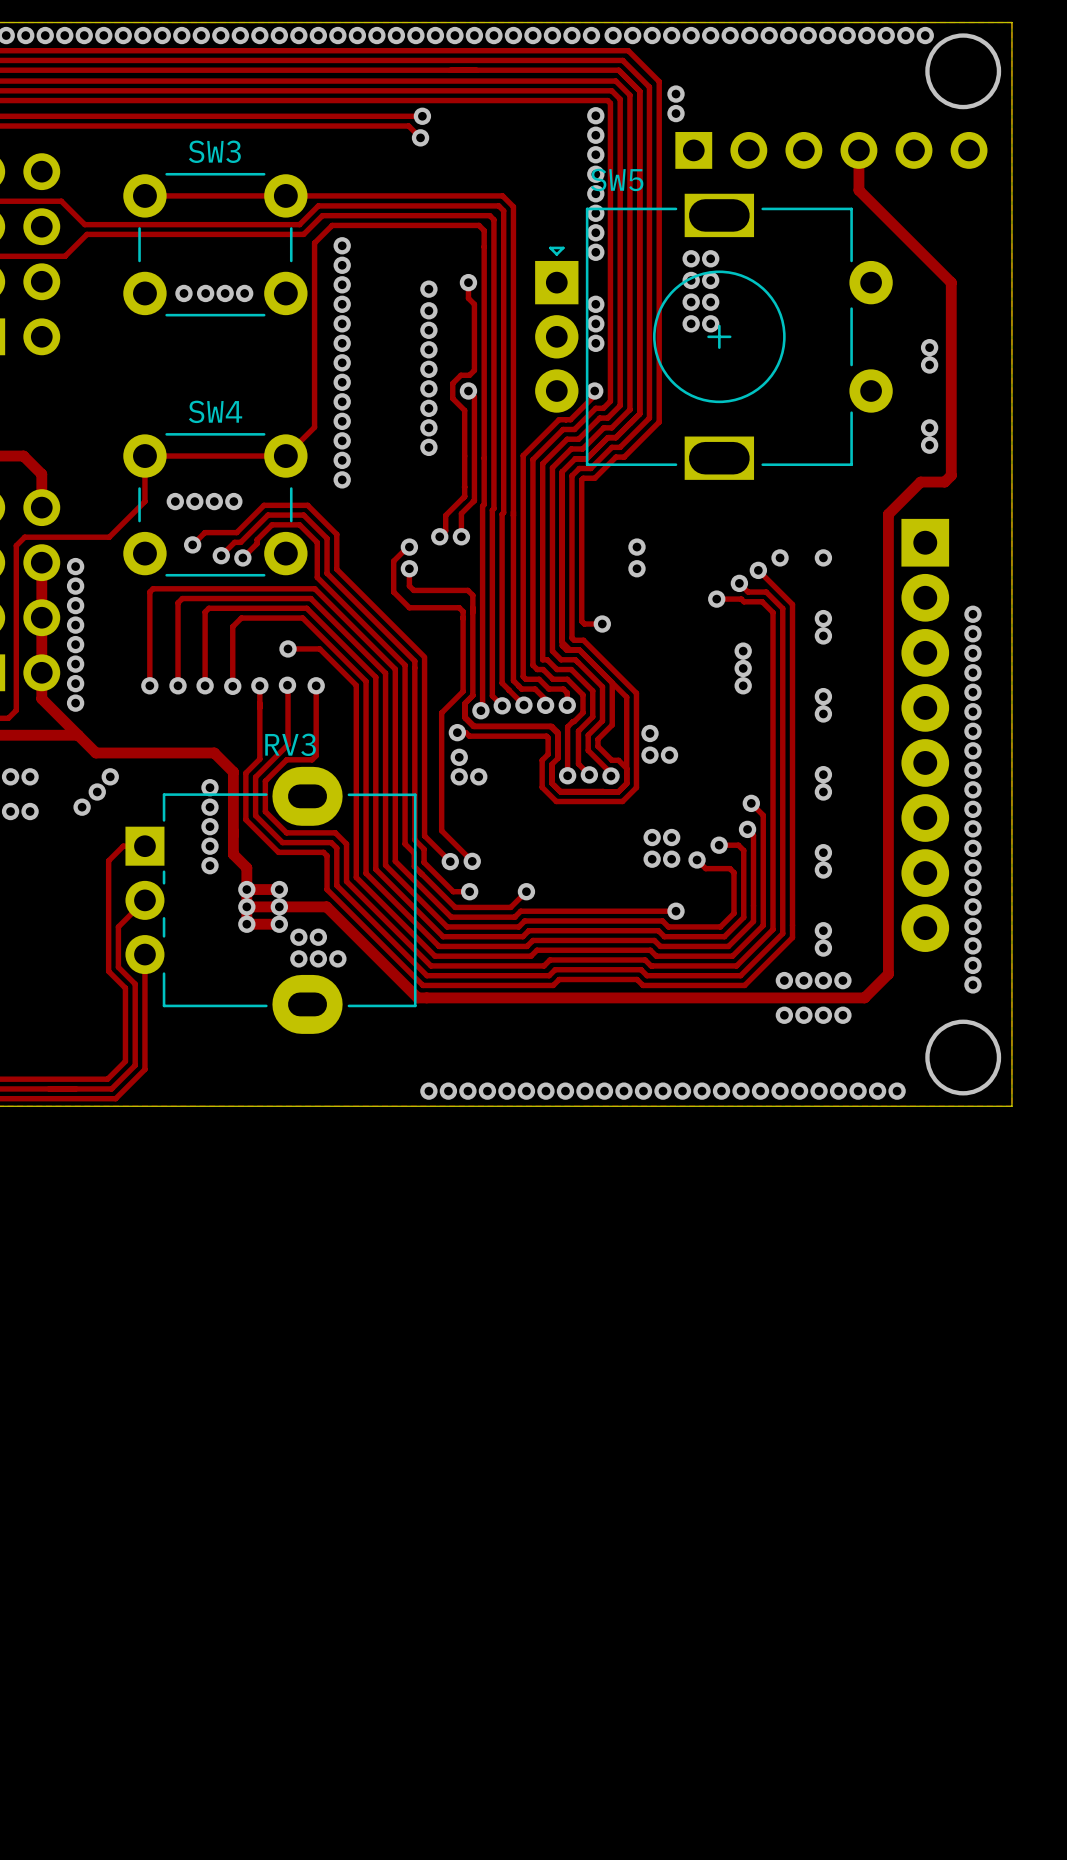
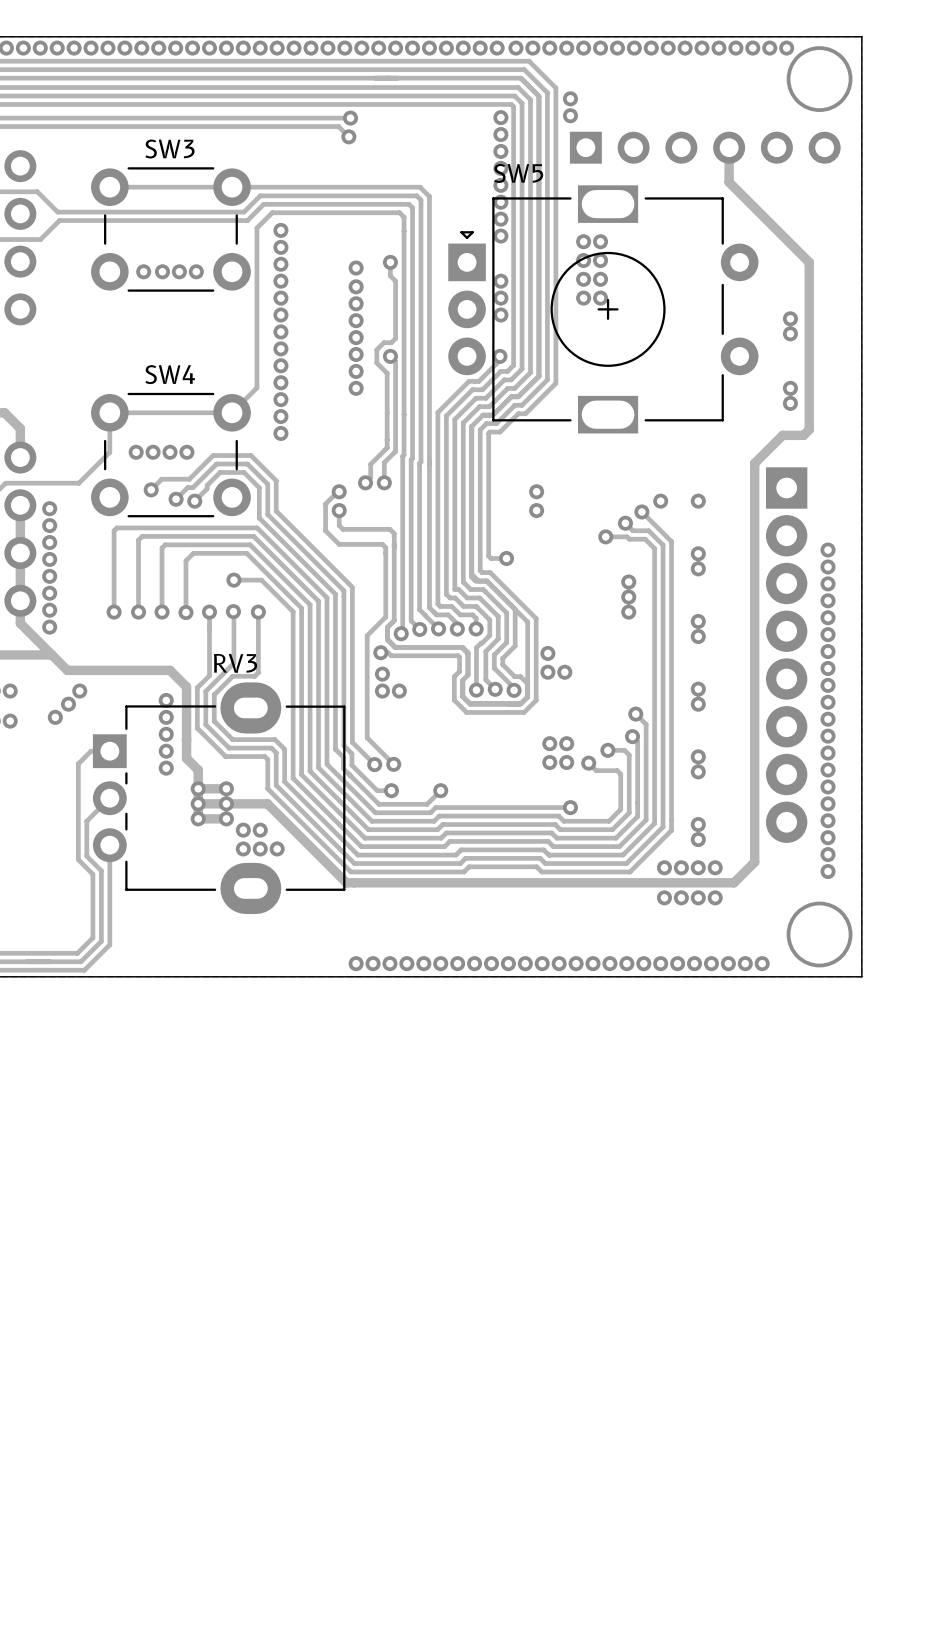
via: (428, 447) -> none

